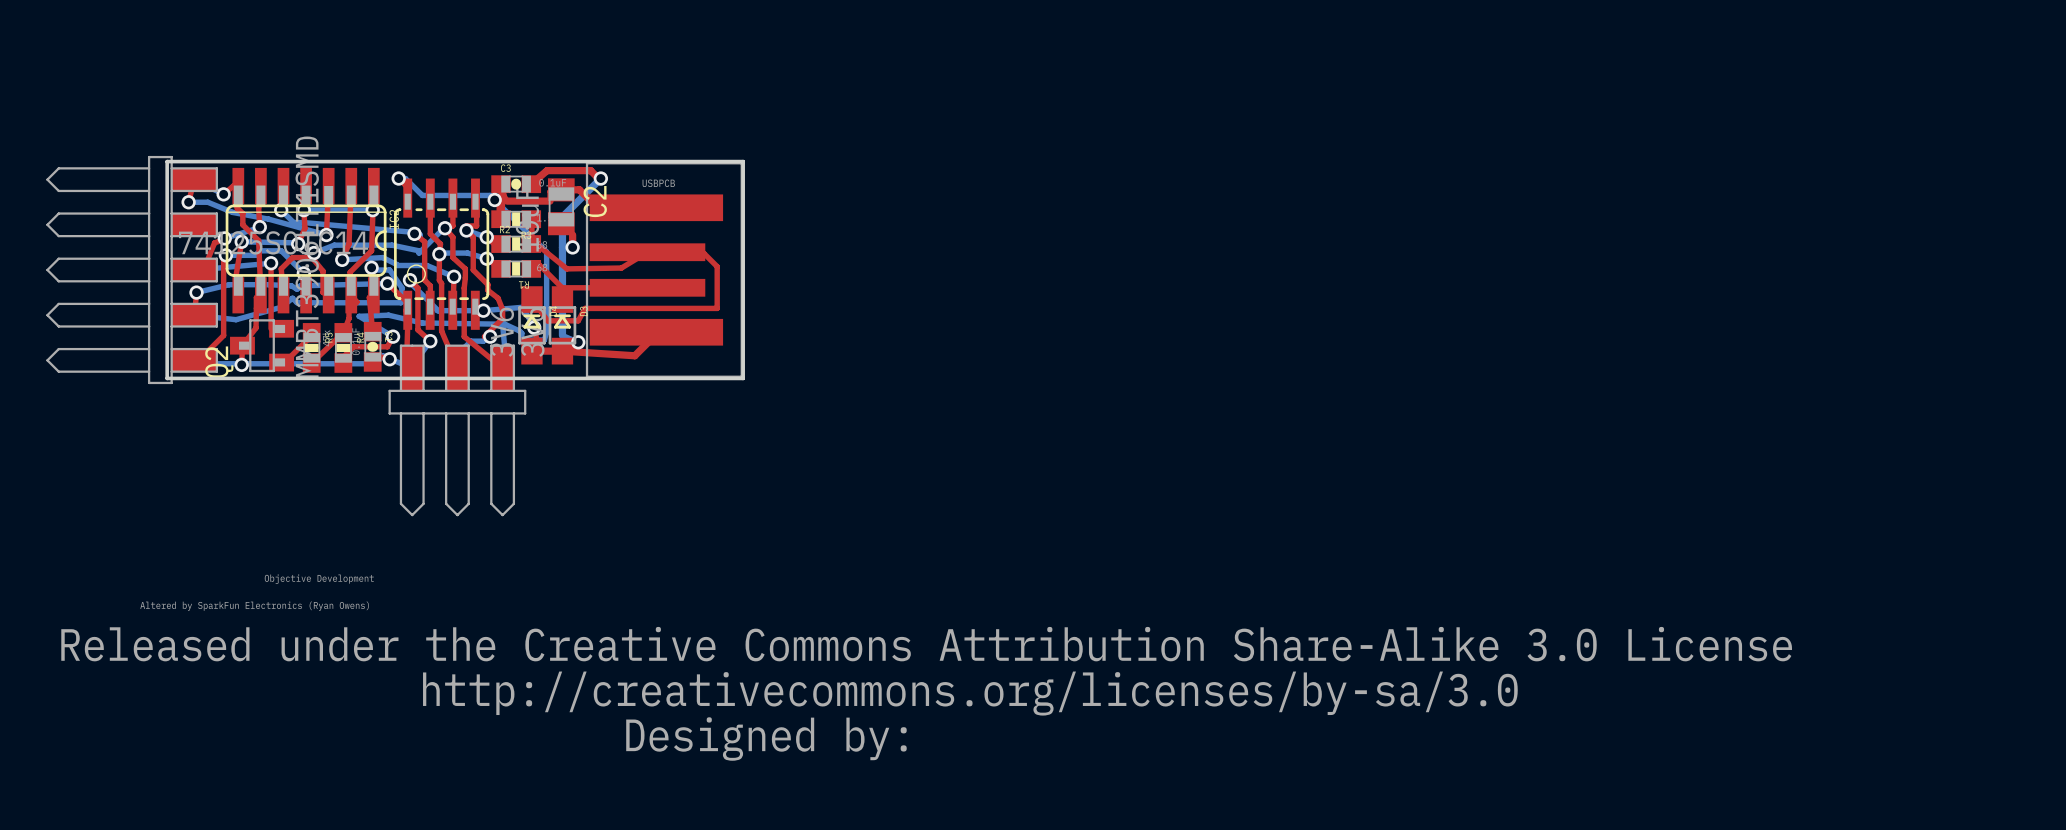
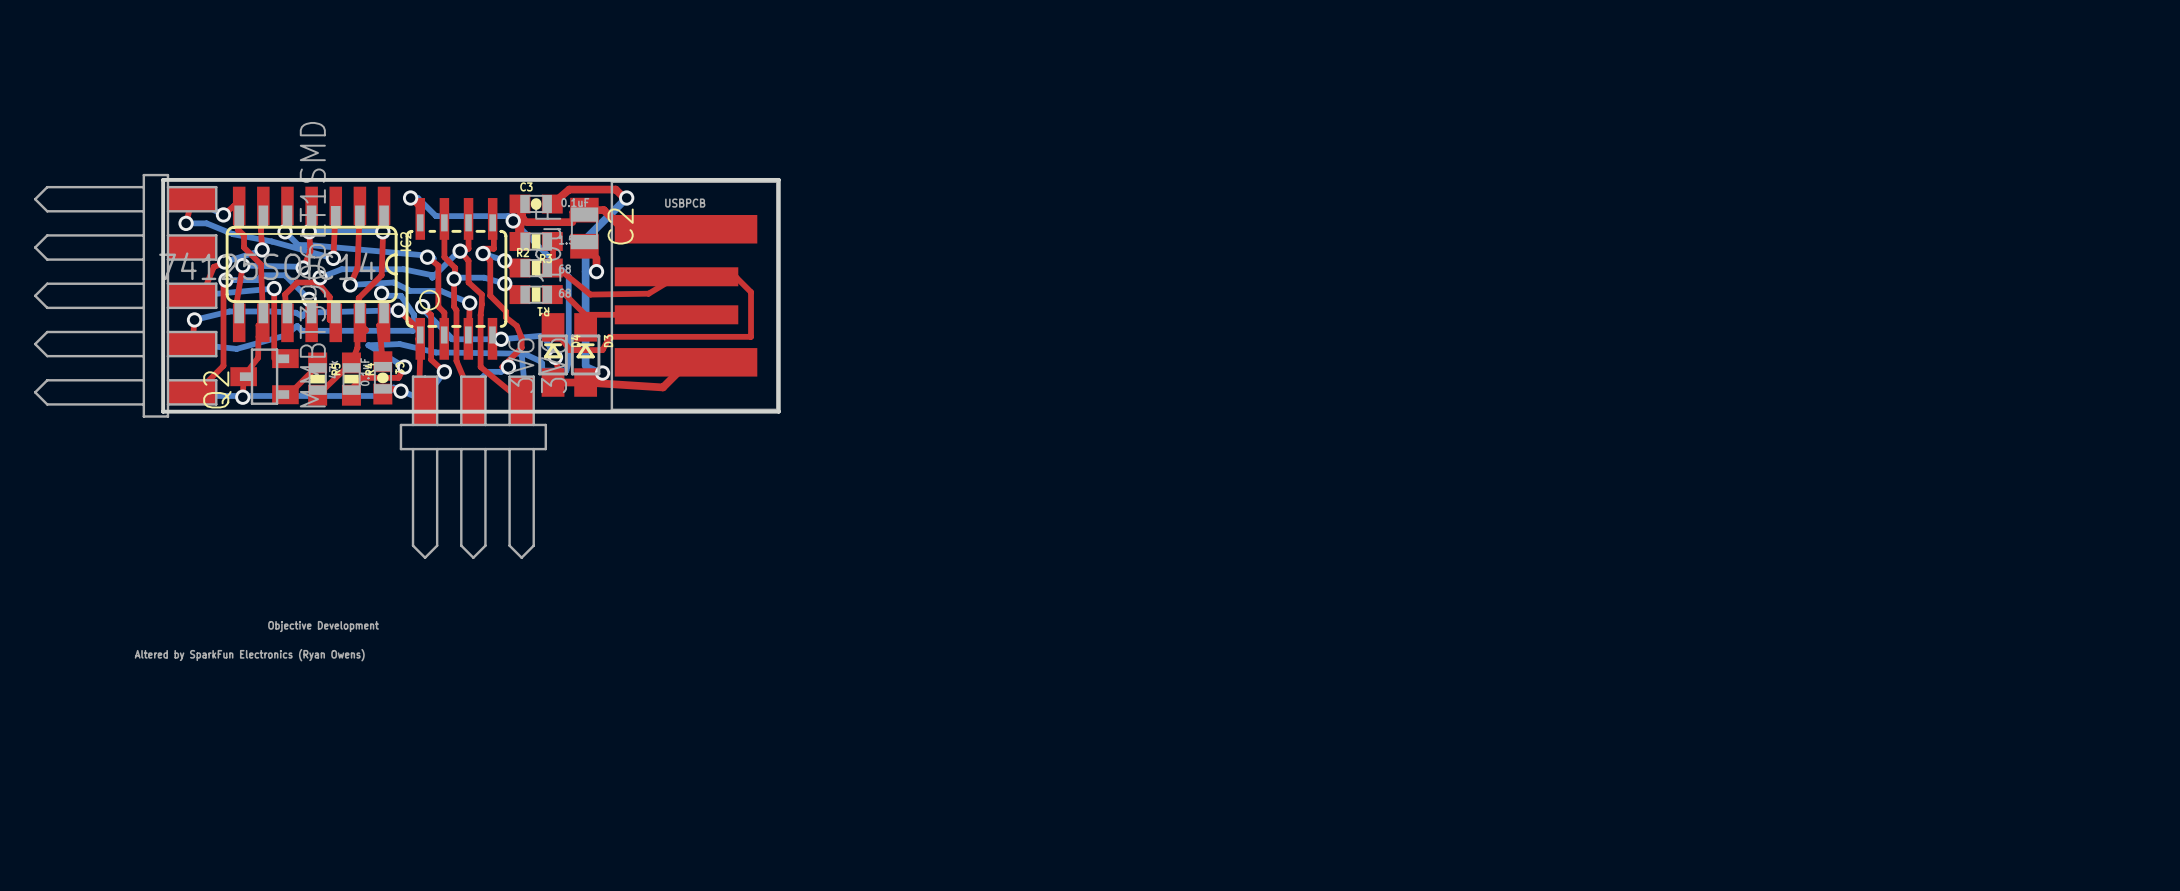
drawing: [61, 626, 1793, 761] -> none

